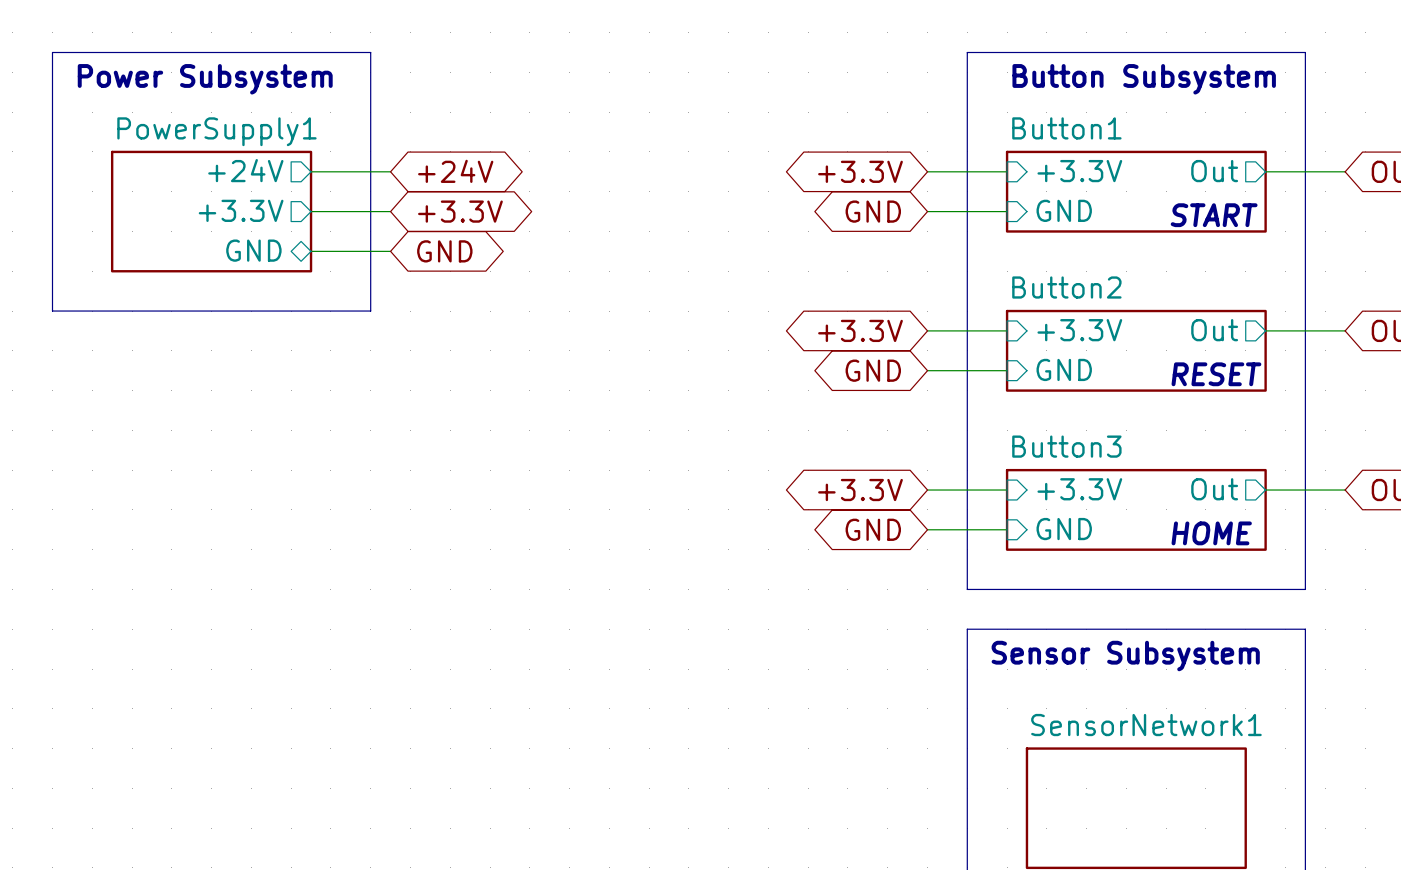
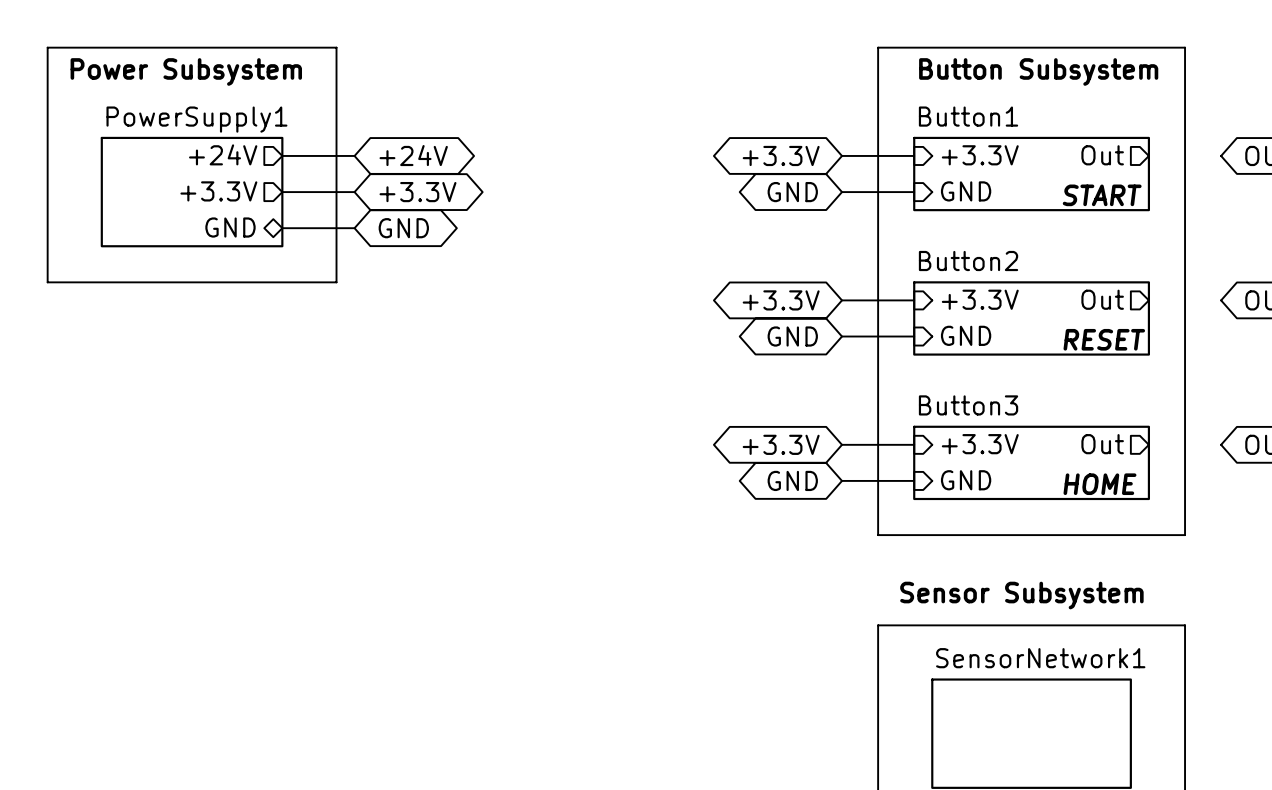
wire: (1265, 171) (1345, 171) -> none
wire: (1265, 330) (1345, 330) -> none
wire: (1265, 490) (1345, 490) -> none
line: (967, 688) (967, 629) (1305, 629) (1305, 688) -> (878, 625) (1185, 625)

